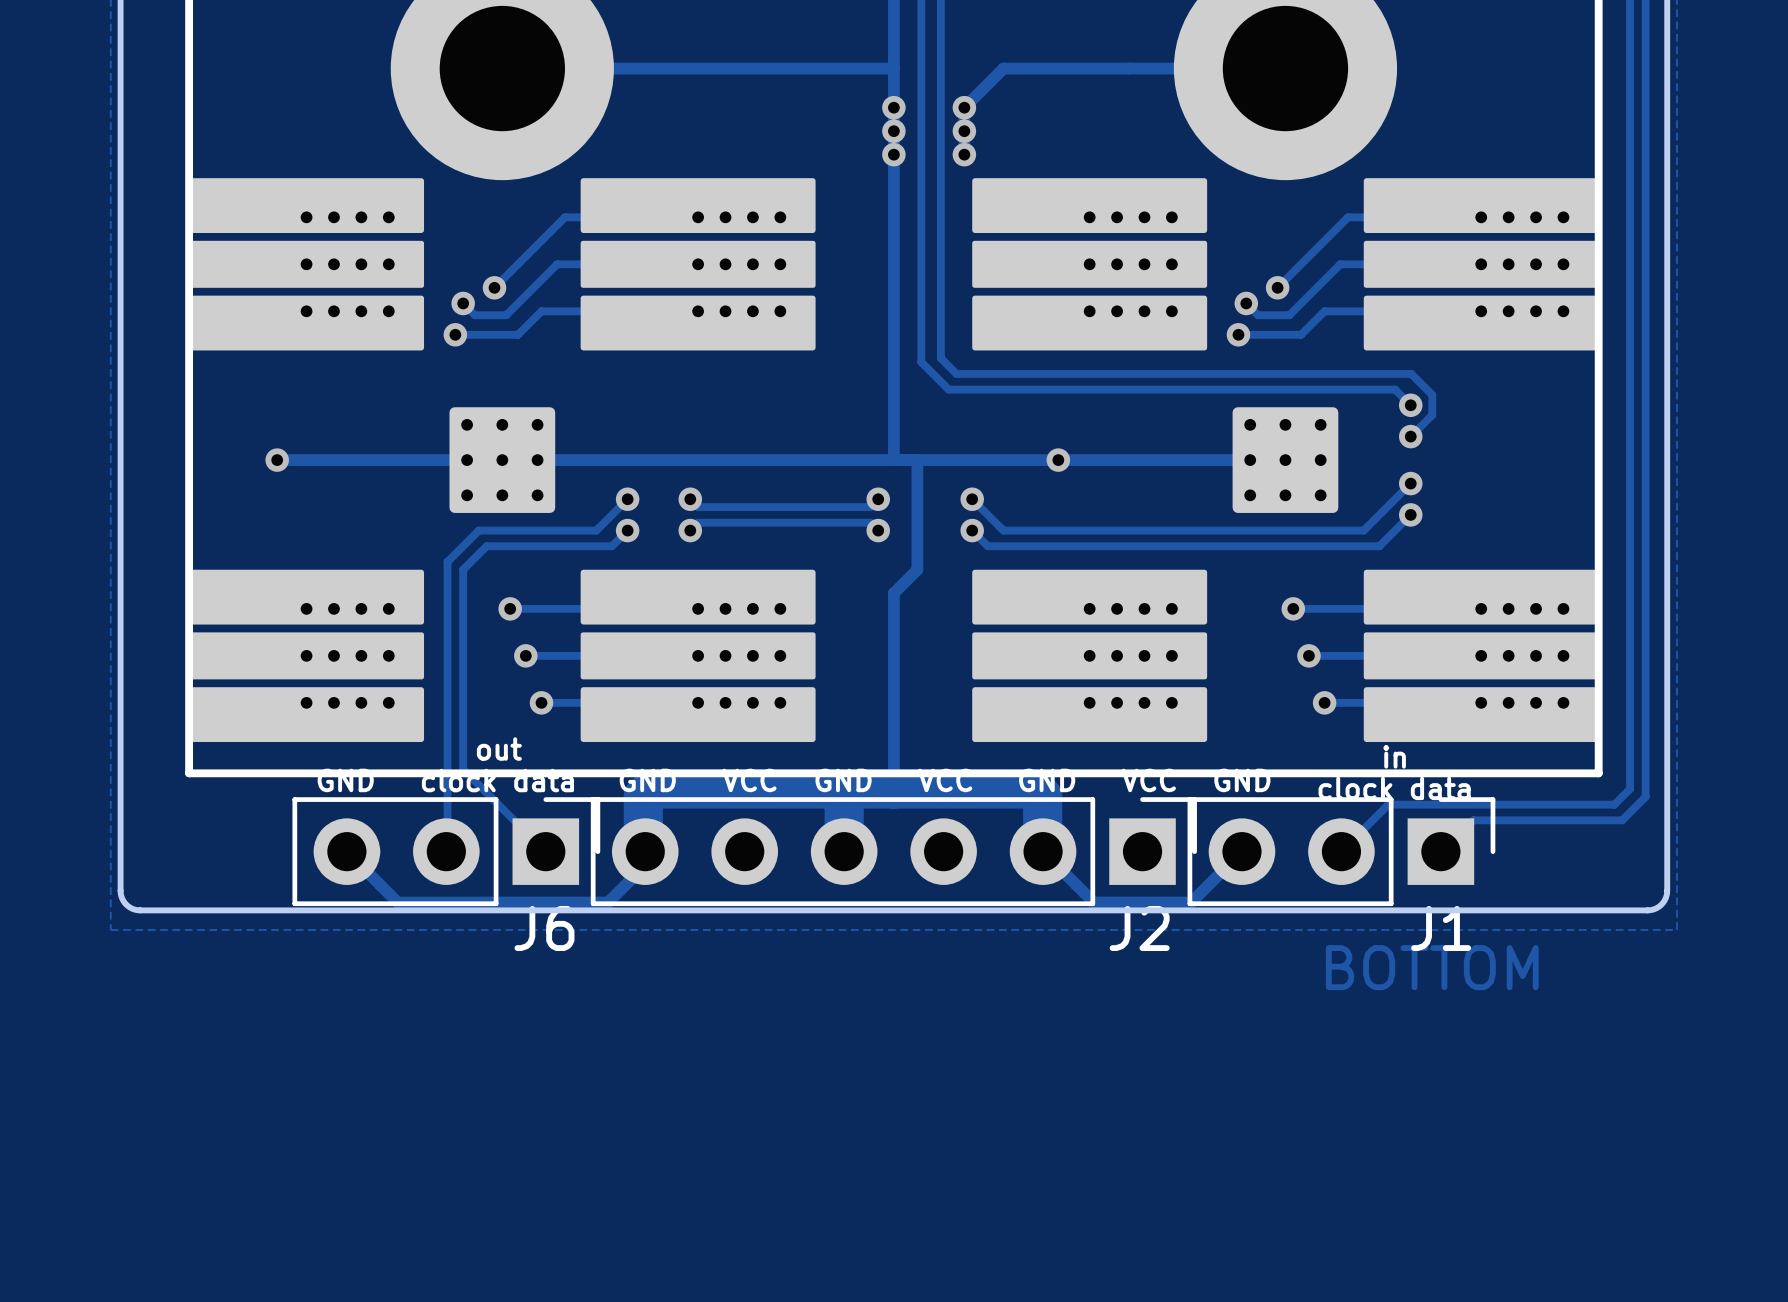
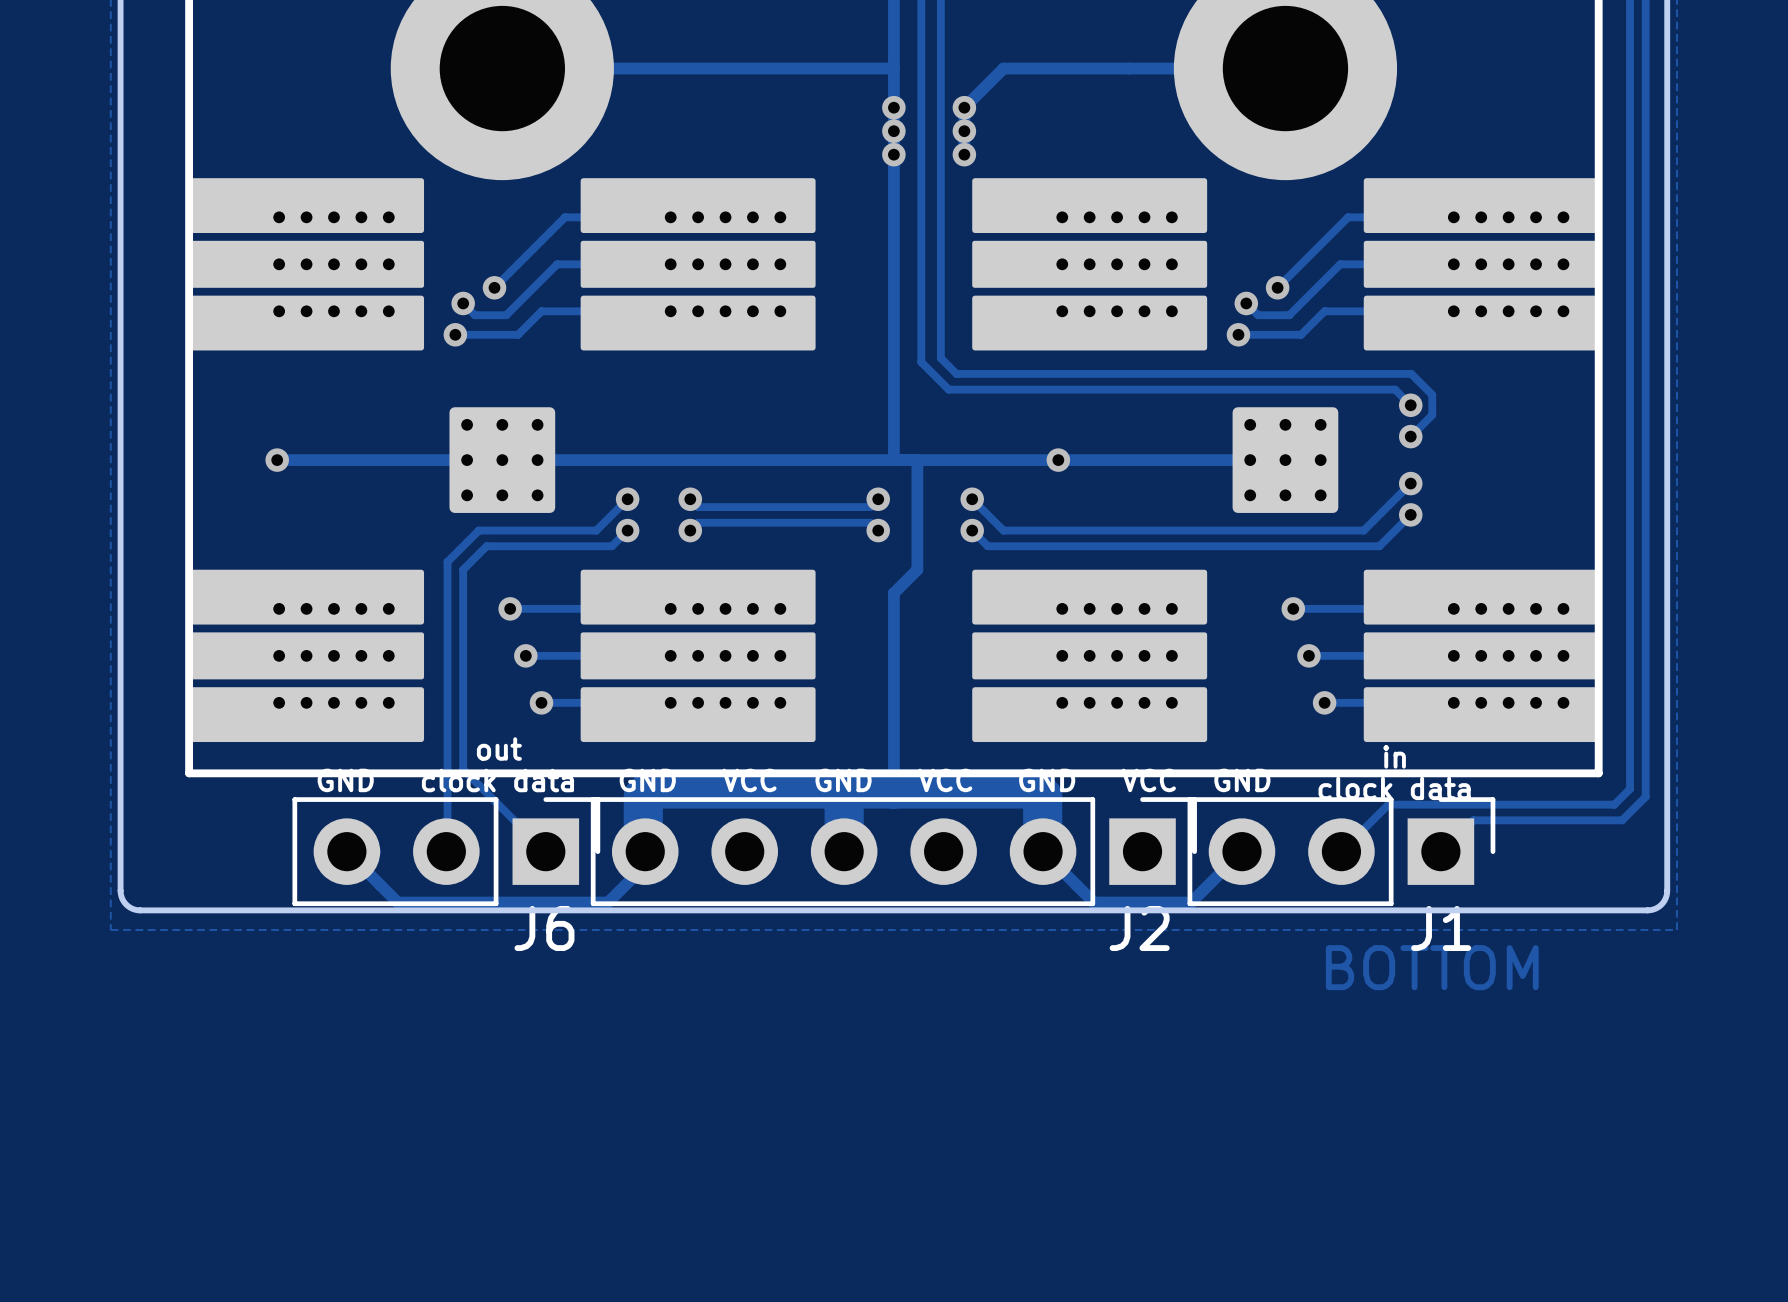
part footprint: [189, 178, 425, 351] -> [189, 178, 425, 351]
part footprint: [580, 178, 816, 351] -> [580, 178, 816, 351]
part footprint: [972, 178, 1208, 351] -> [972, 178, 1208, 351]
part footprint: [1363, 178, 1599, 351] -> [1363, 178, 1599, 351]
part footprint: [189, 569, 425, 743] -> [189, 569, 425, 743]
part footprint: [580, 569, 816, 743] -> [580, 569, 816, 743]
part footprint: [972, 569, 1208, 743] -> [972, 569, 1208, 743]
part footprint: [1363, 569, 1599, 743] -> [1363, 569, 1599, 743]

